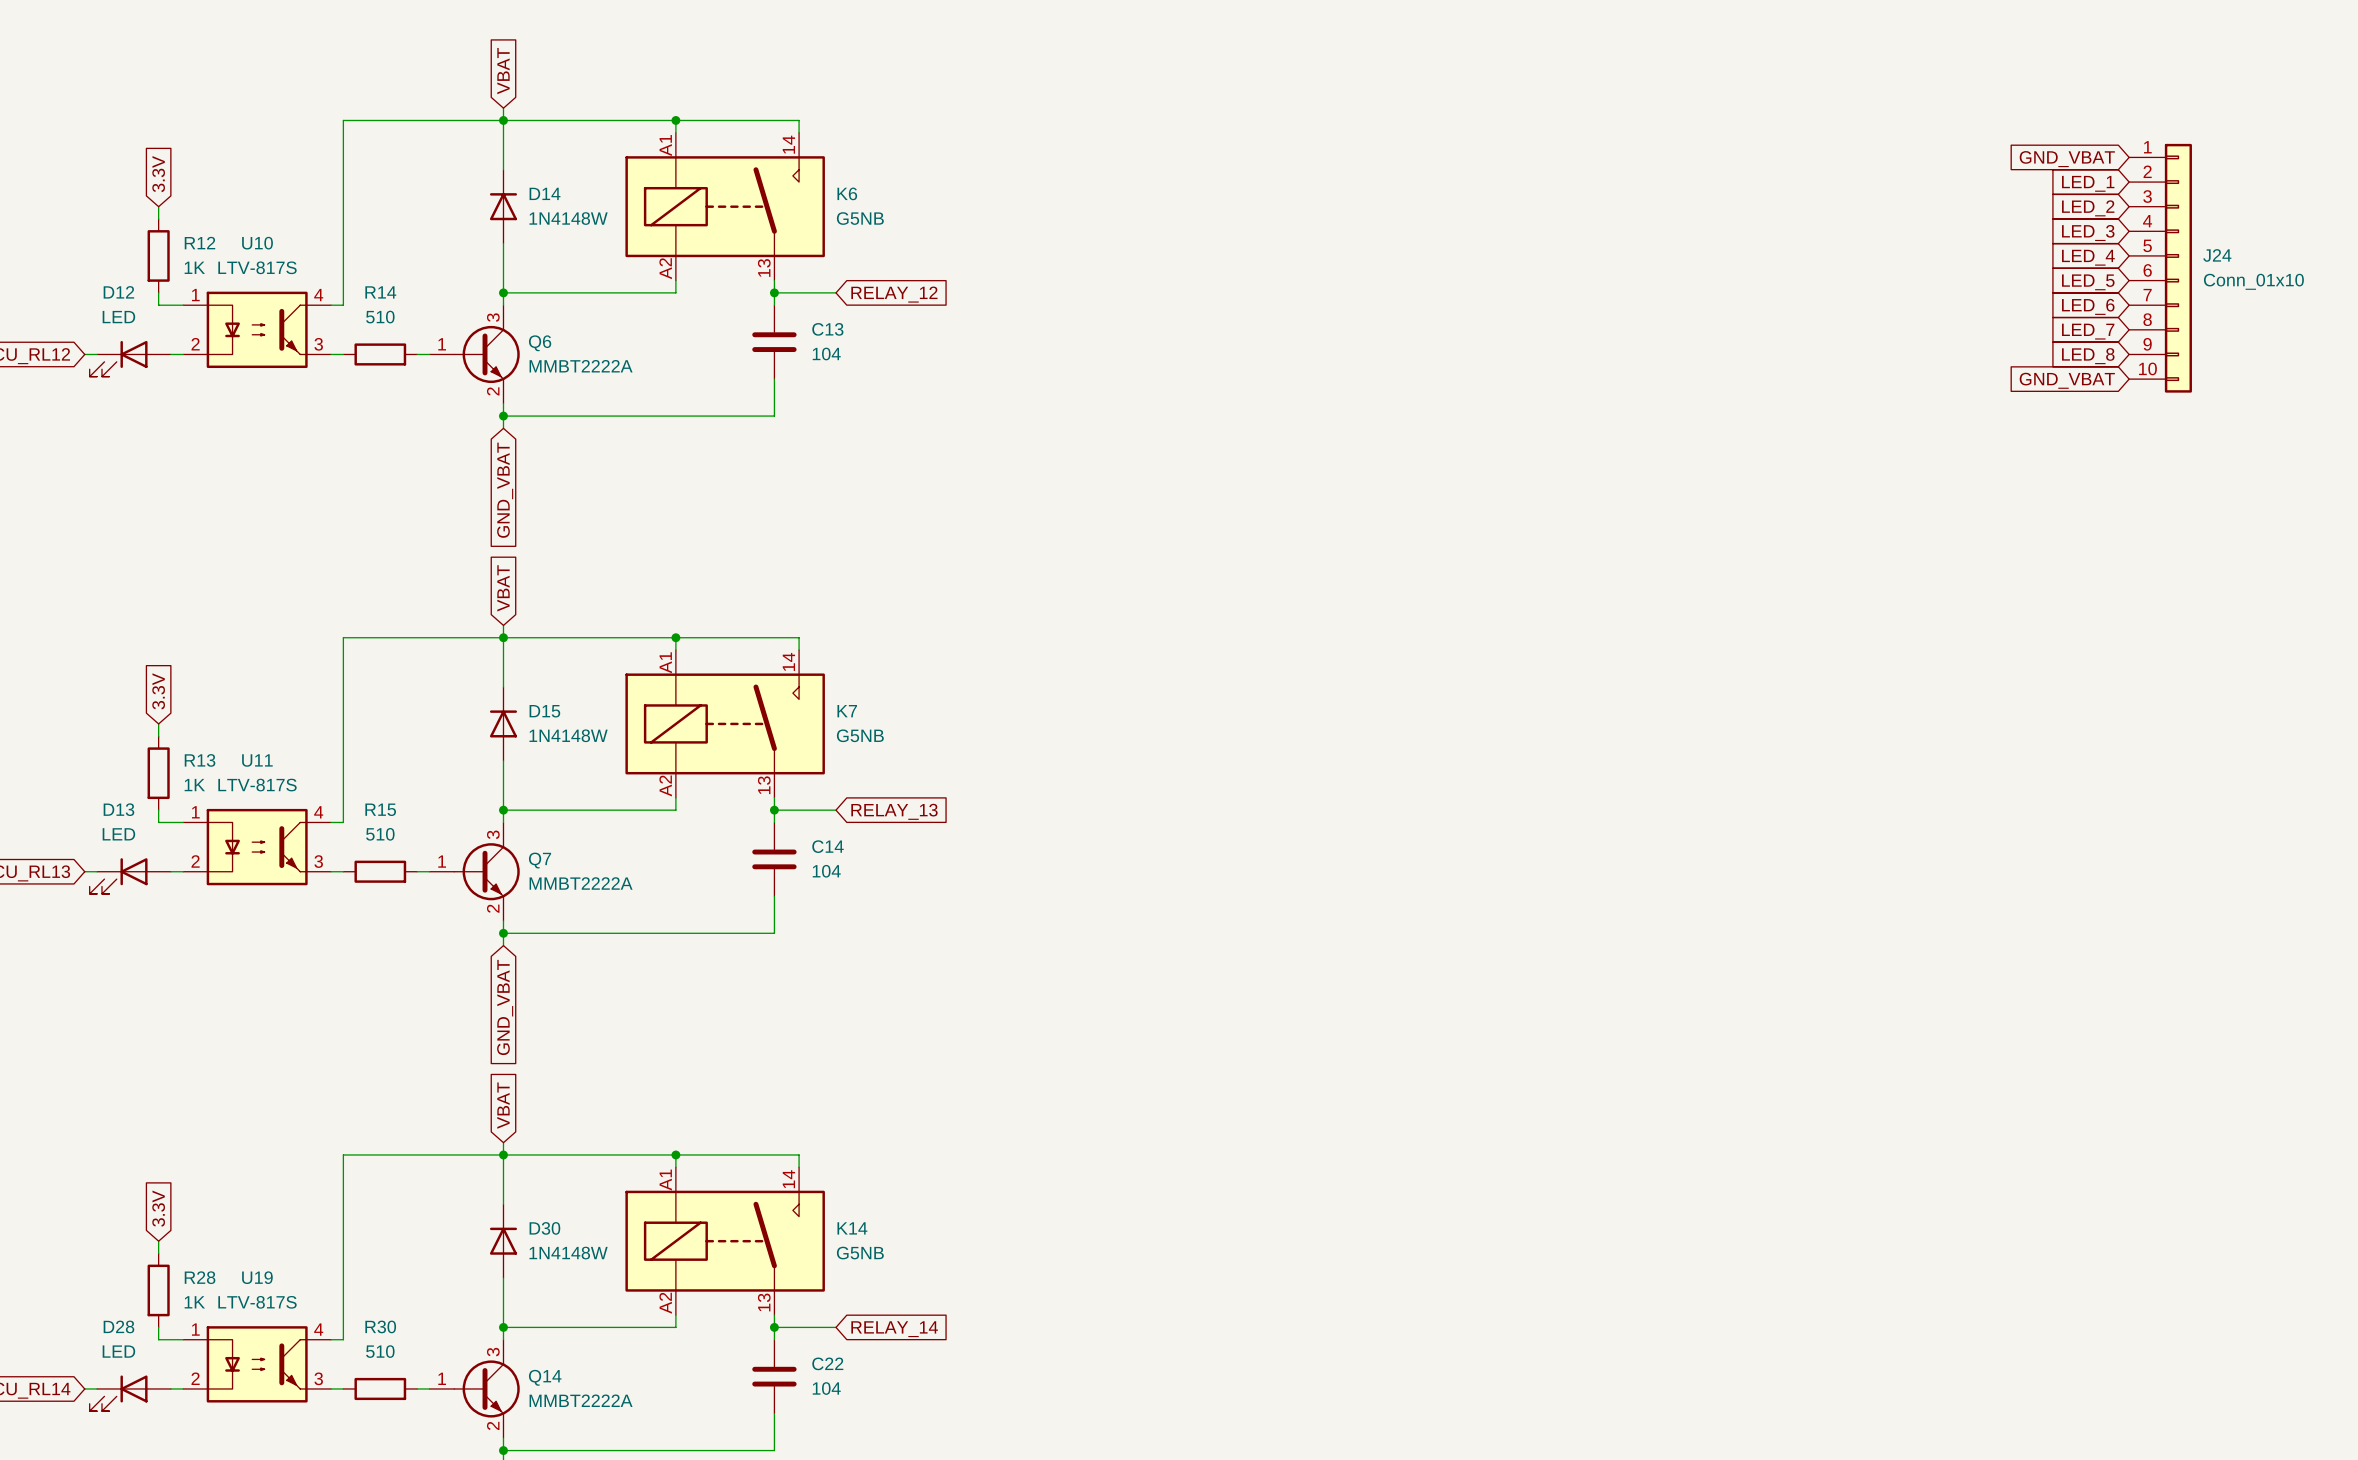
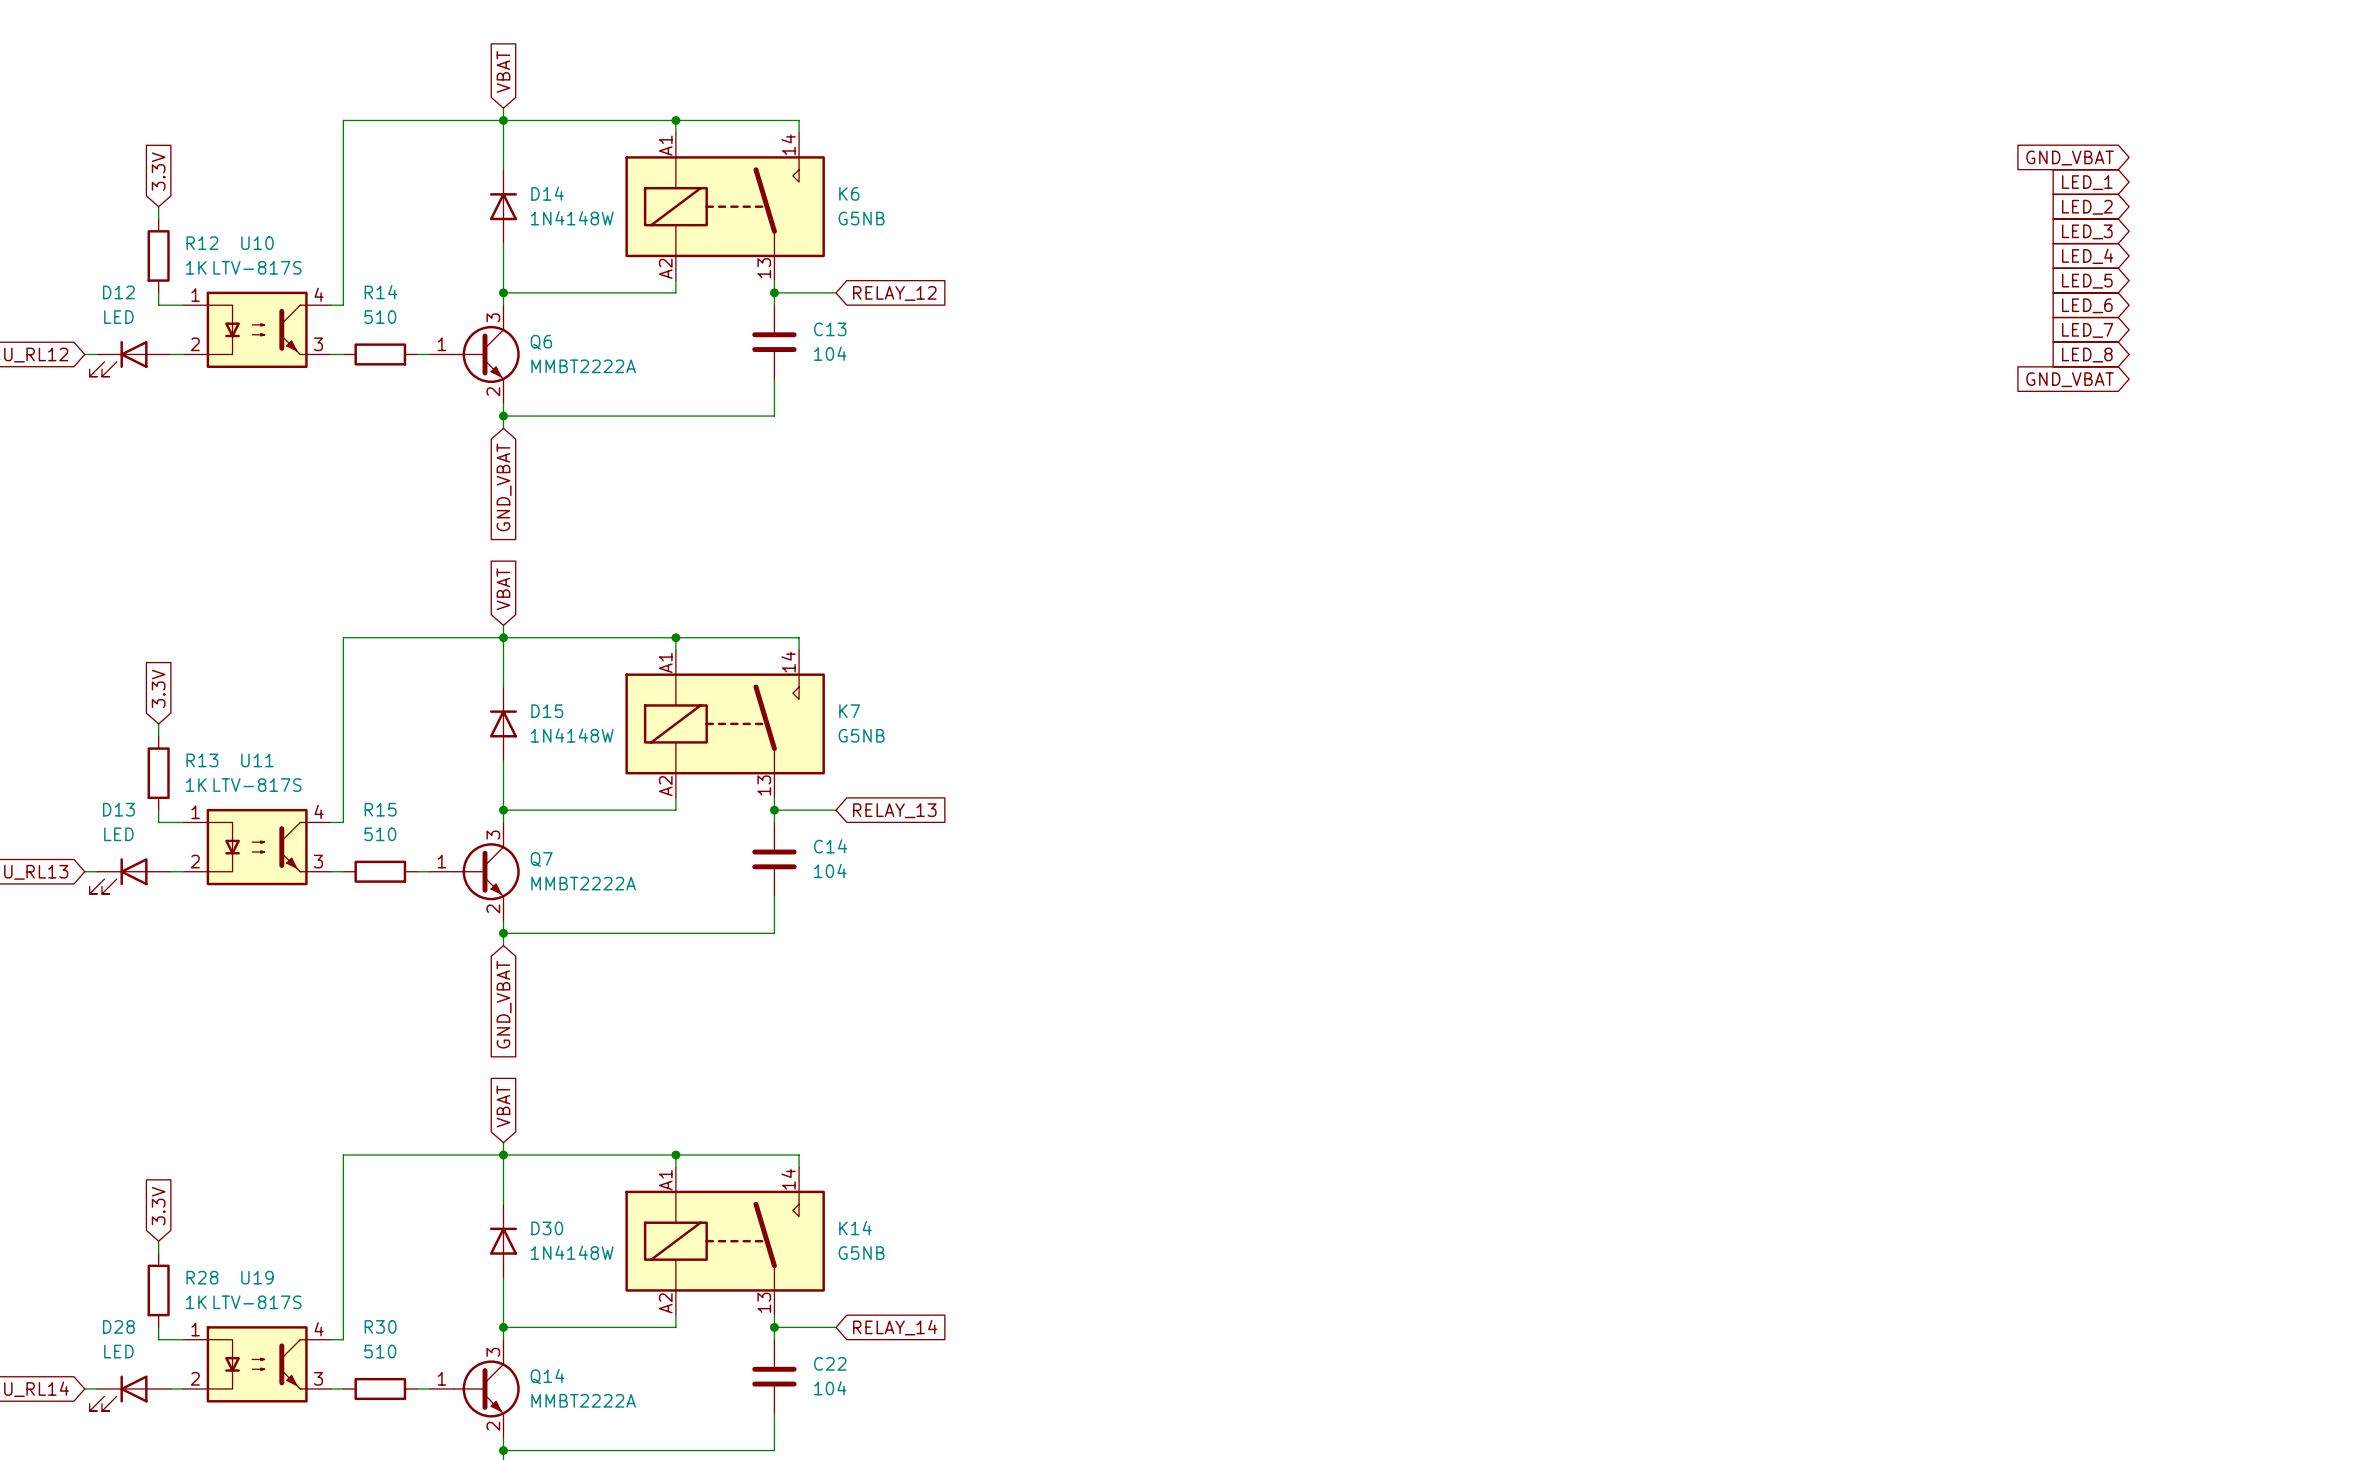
J24: Conn_01x10 (2160, 268) -> none

